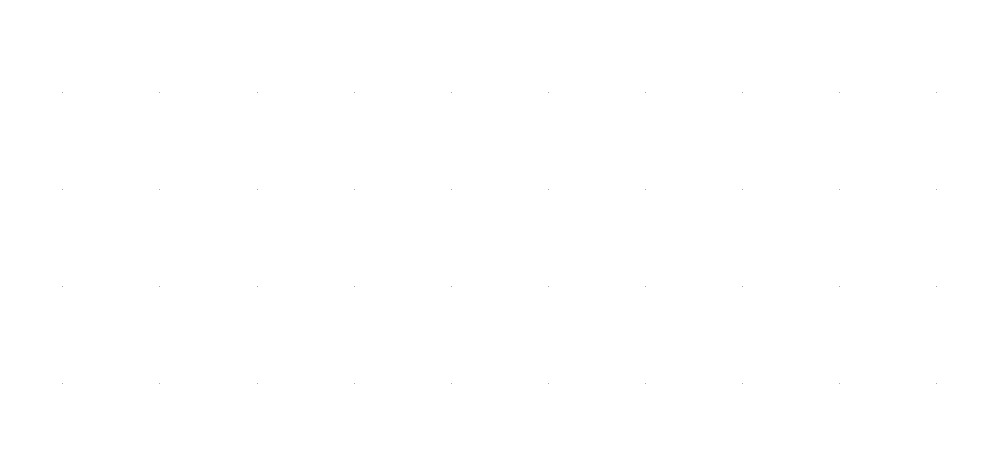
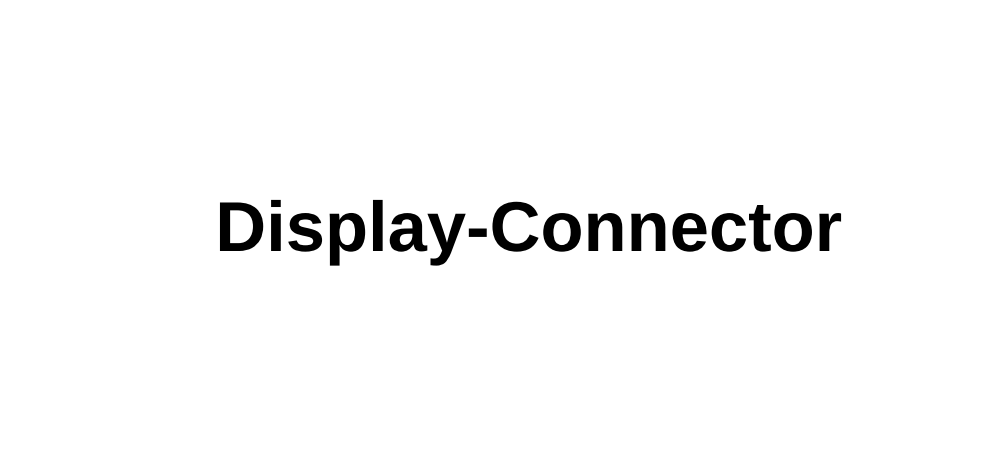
text: none -> Display-Connector (530, 232)

